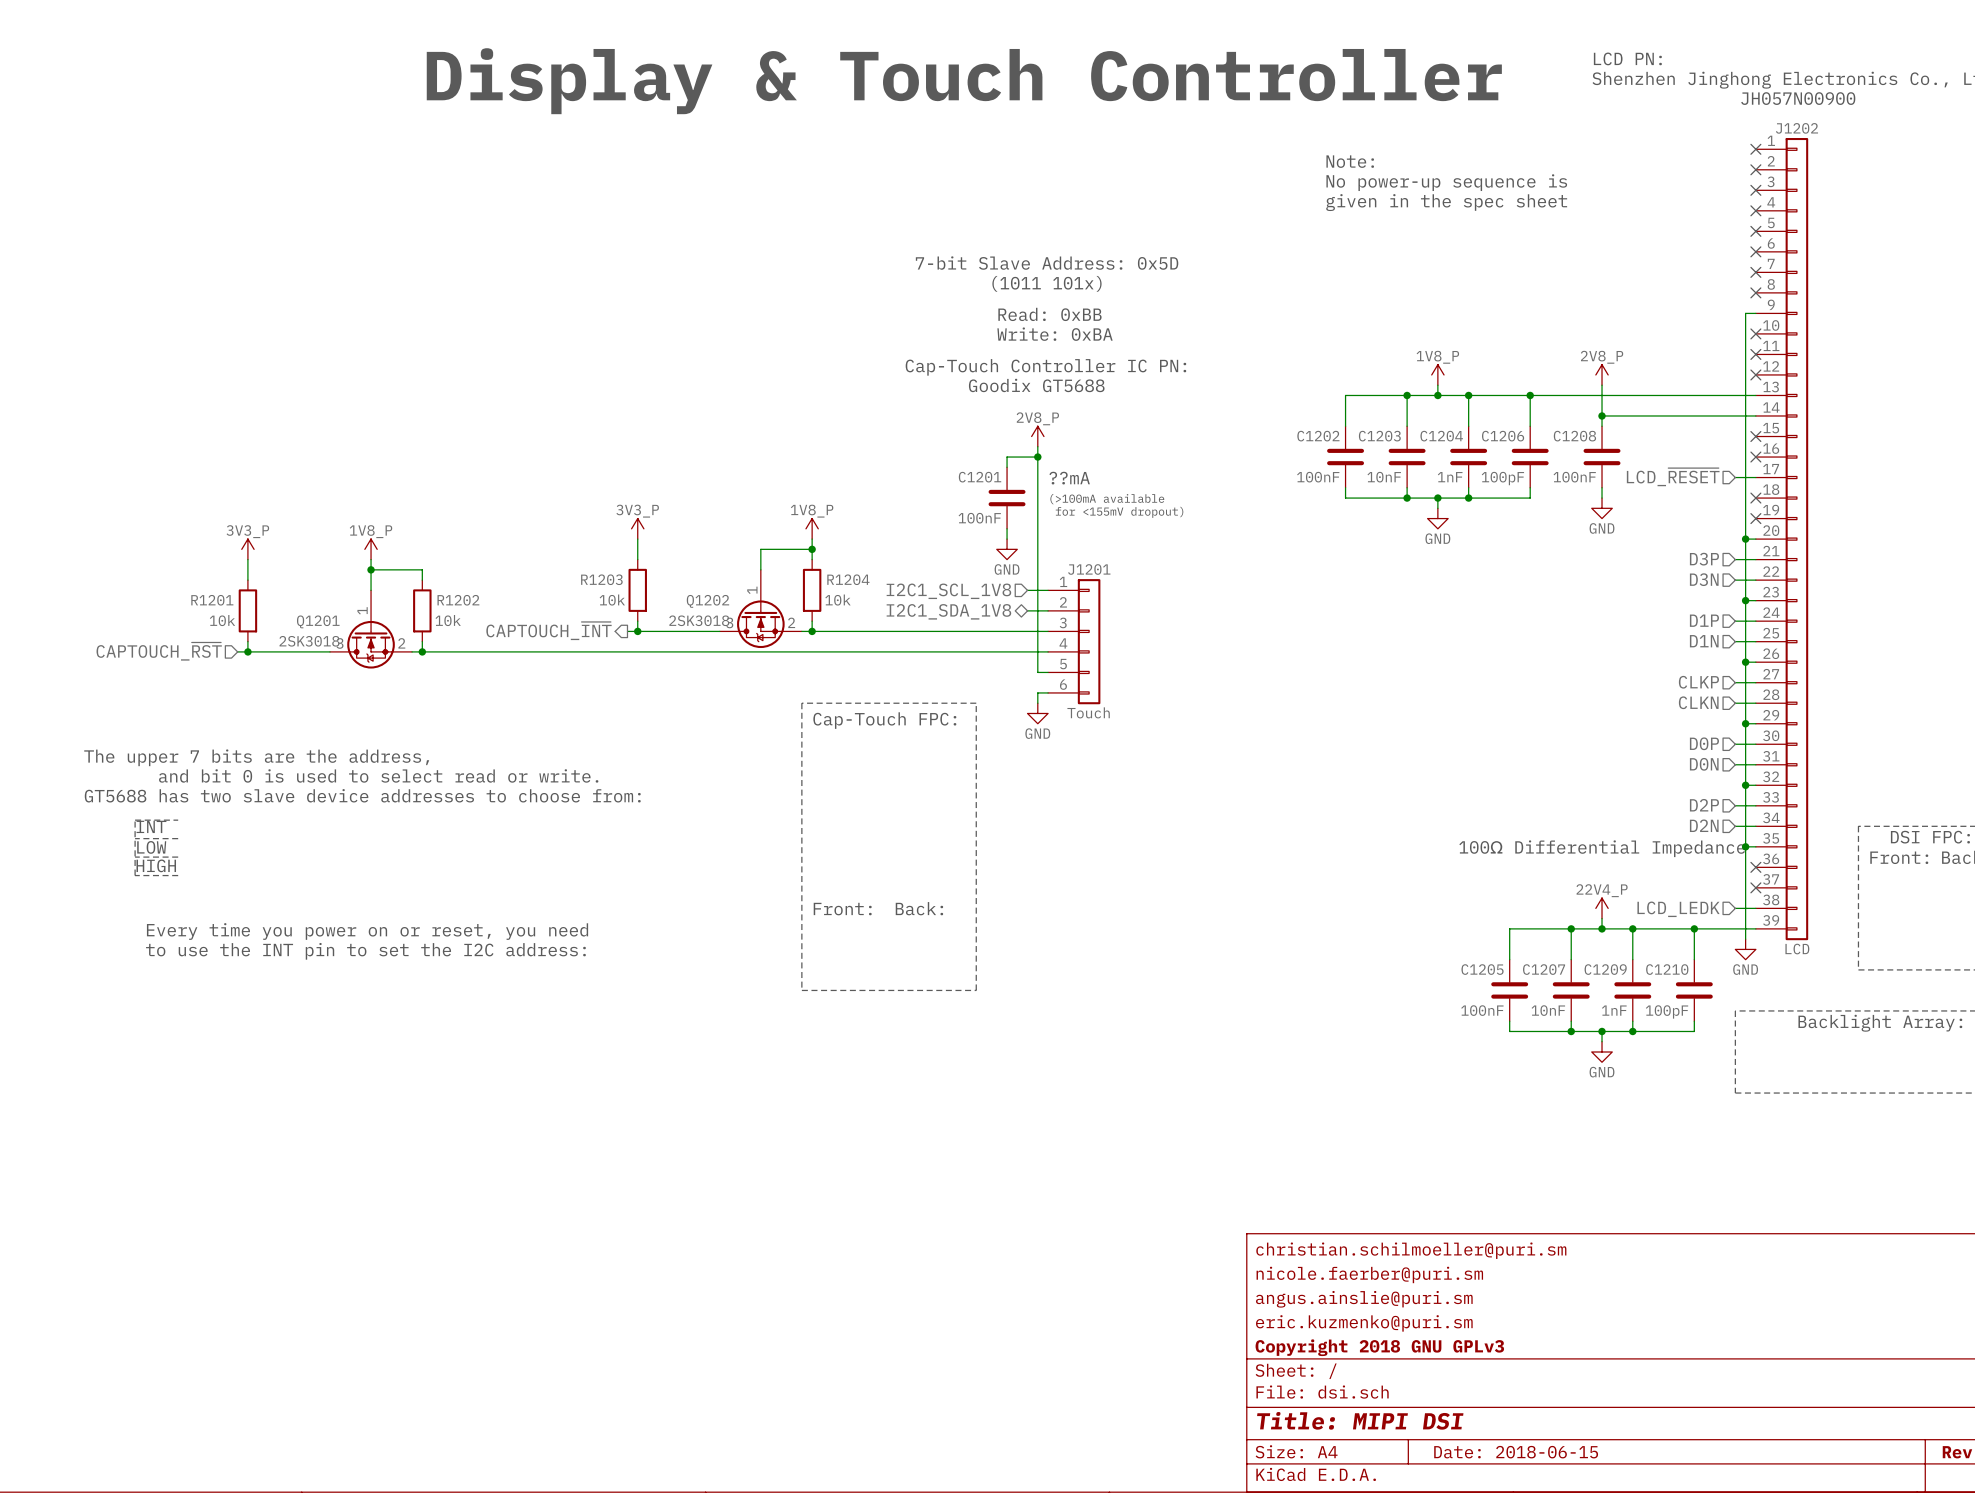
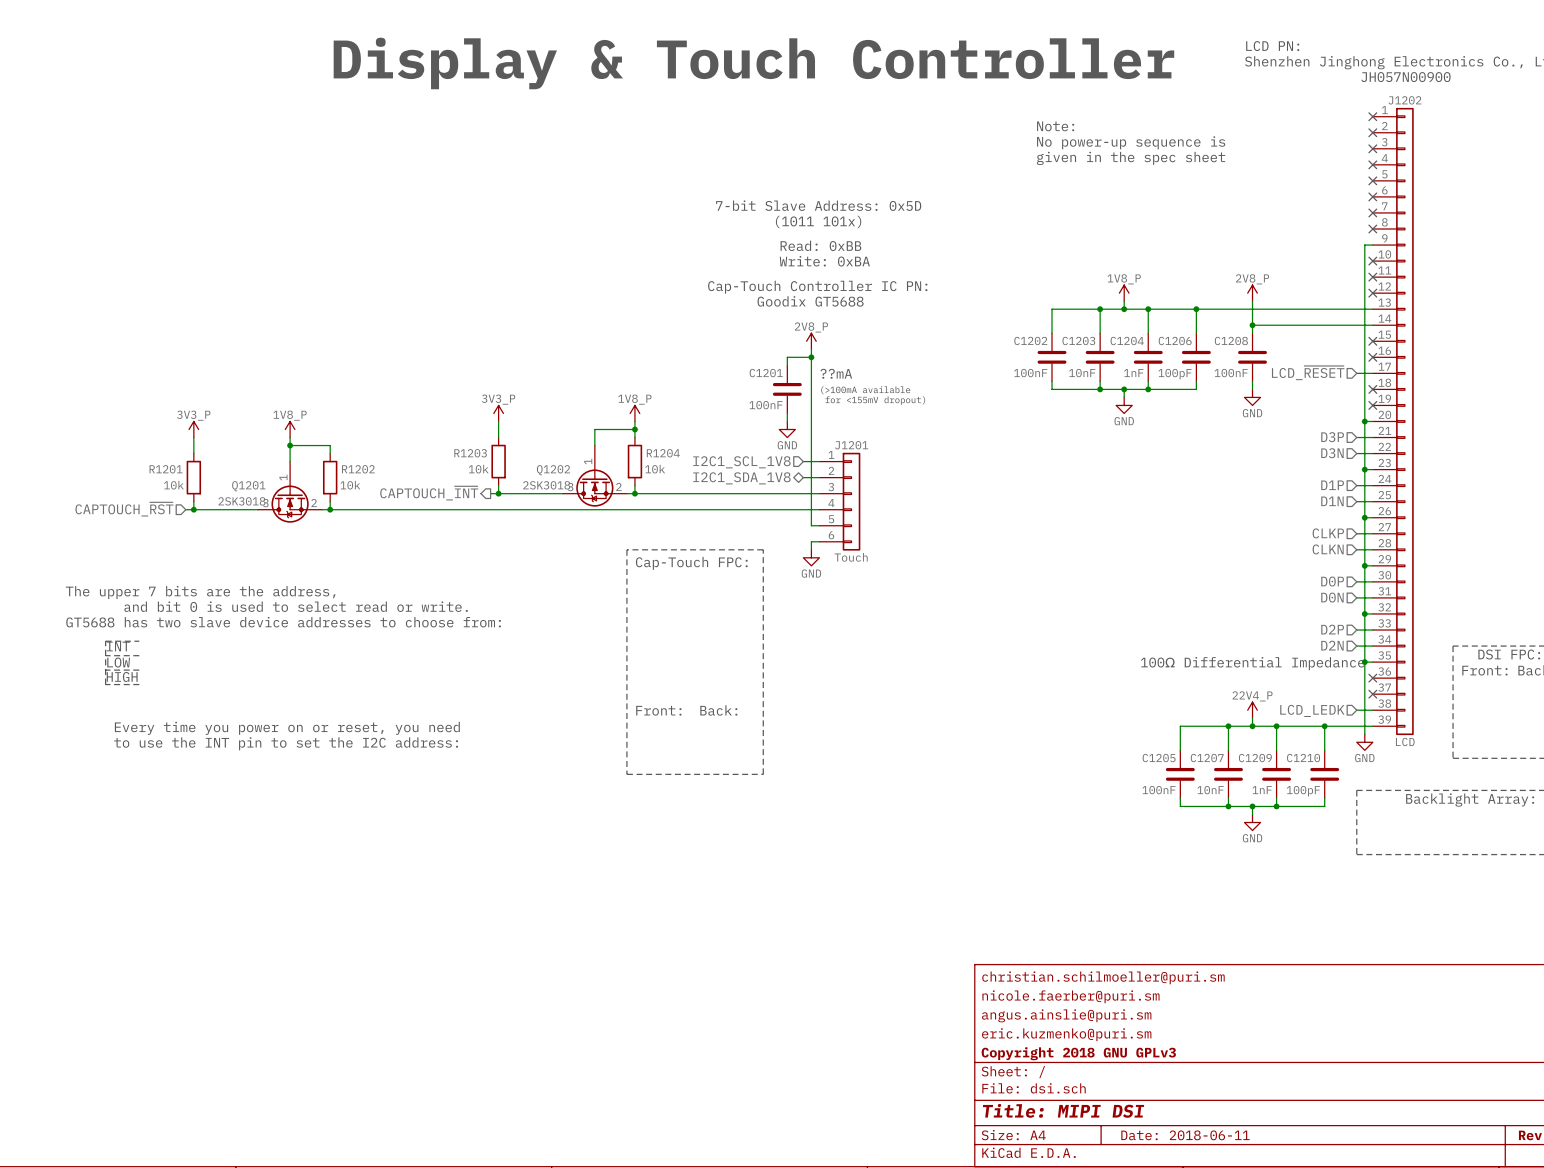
title block: Date: 2018-06-15 (1516, 1452) -> Date: 2018-06-11 (1185, 1135)

